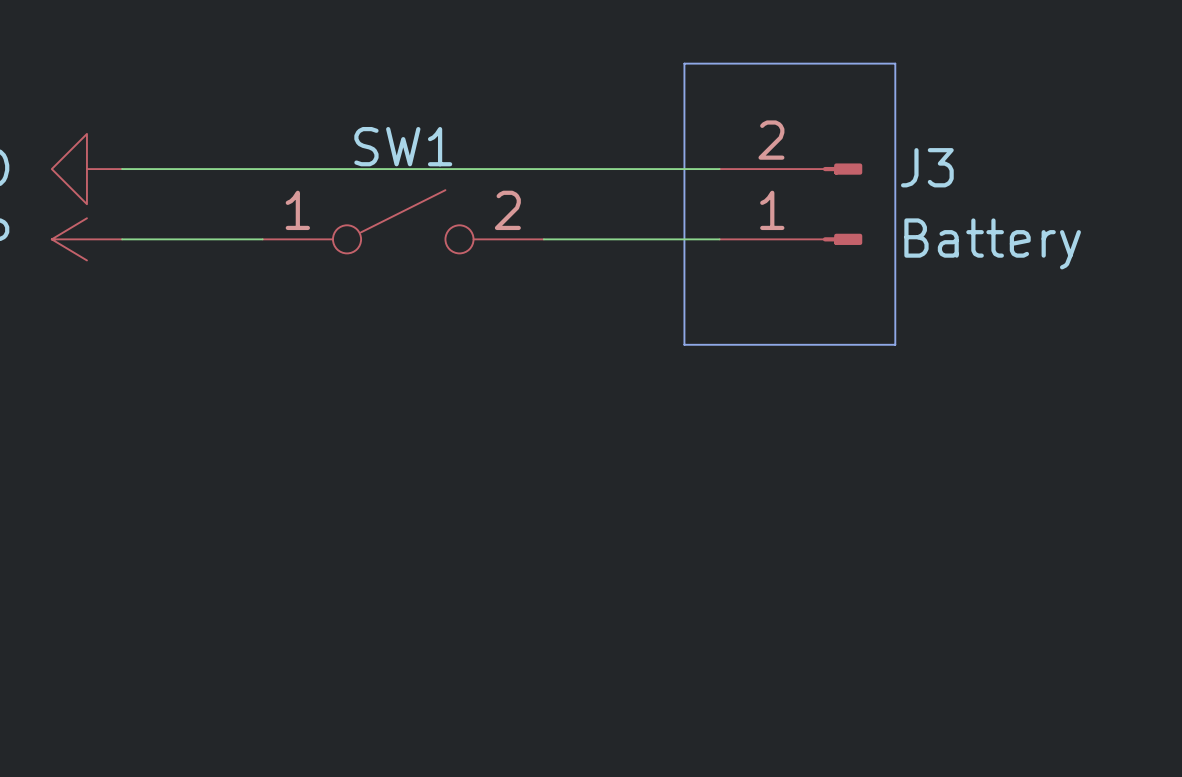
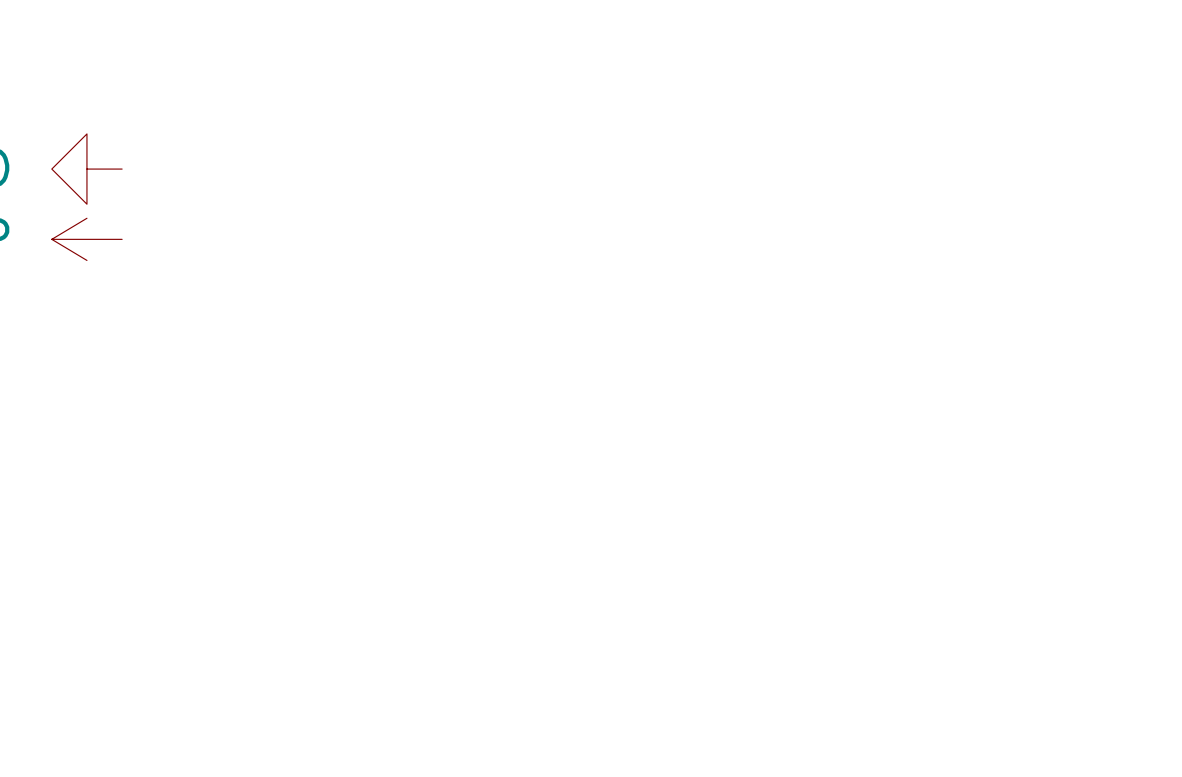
line: (684, 63) (895, 63) (895, 344) (684, 344) (684, 63) -> none
wire: (122, 169) (719, 169) -> none
J3: Battery (790, 204) -> none
SW1: (403, 221) -> none
wire: (122, 239) (262, 239) -> none
wire: (543, 239) (719, 239) -> none

